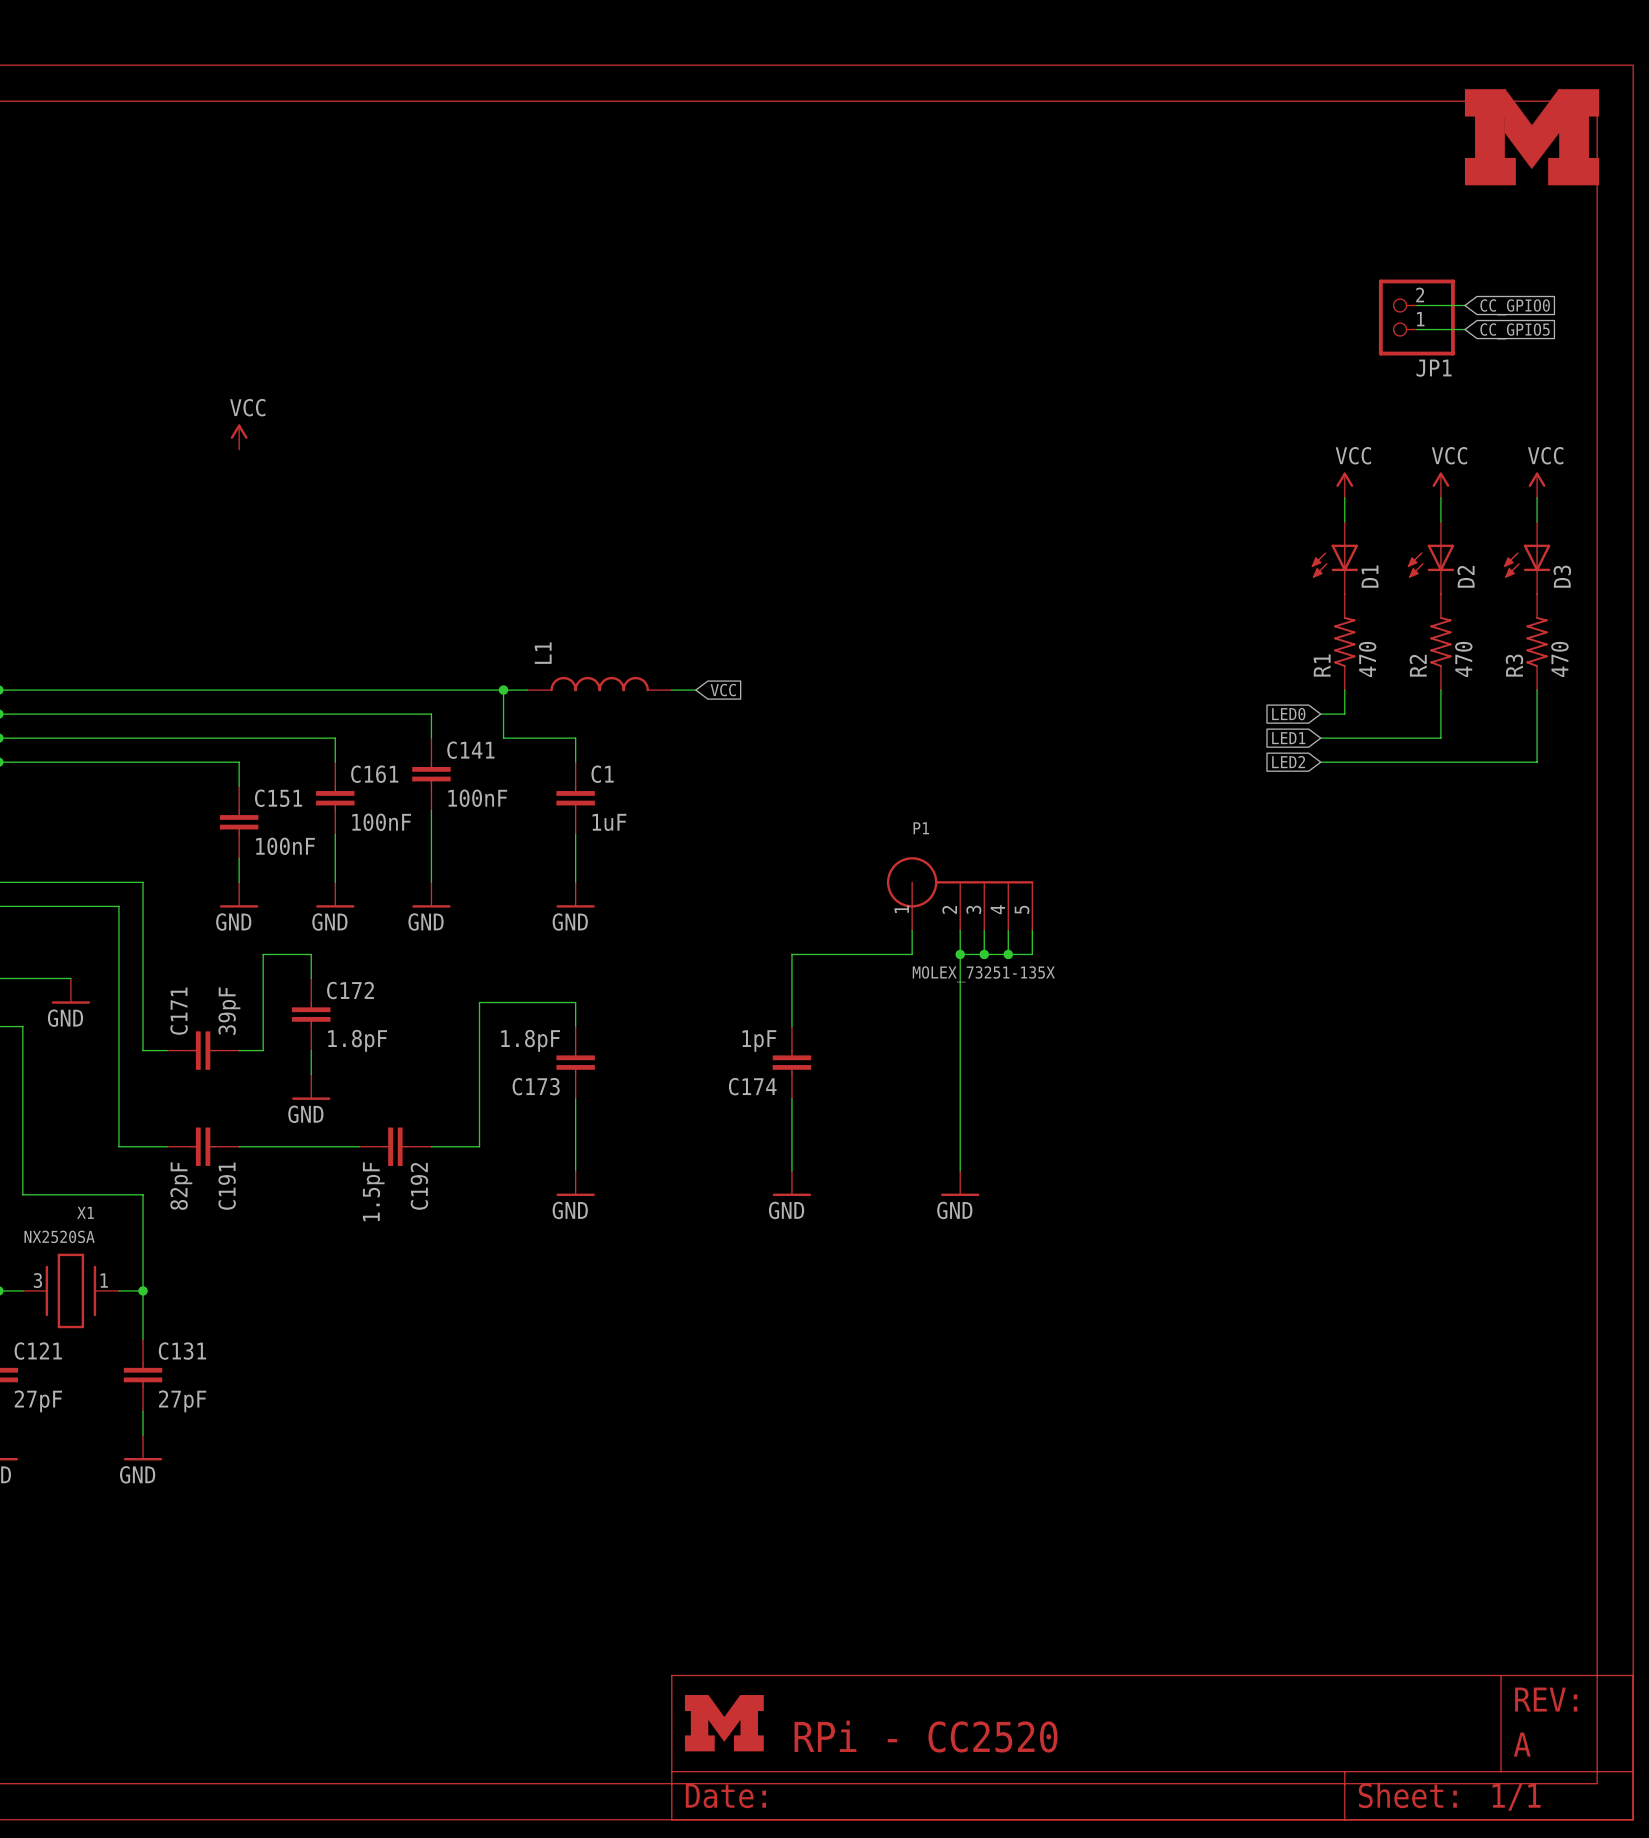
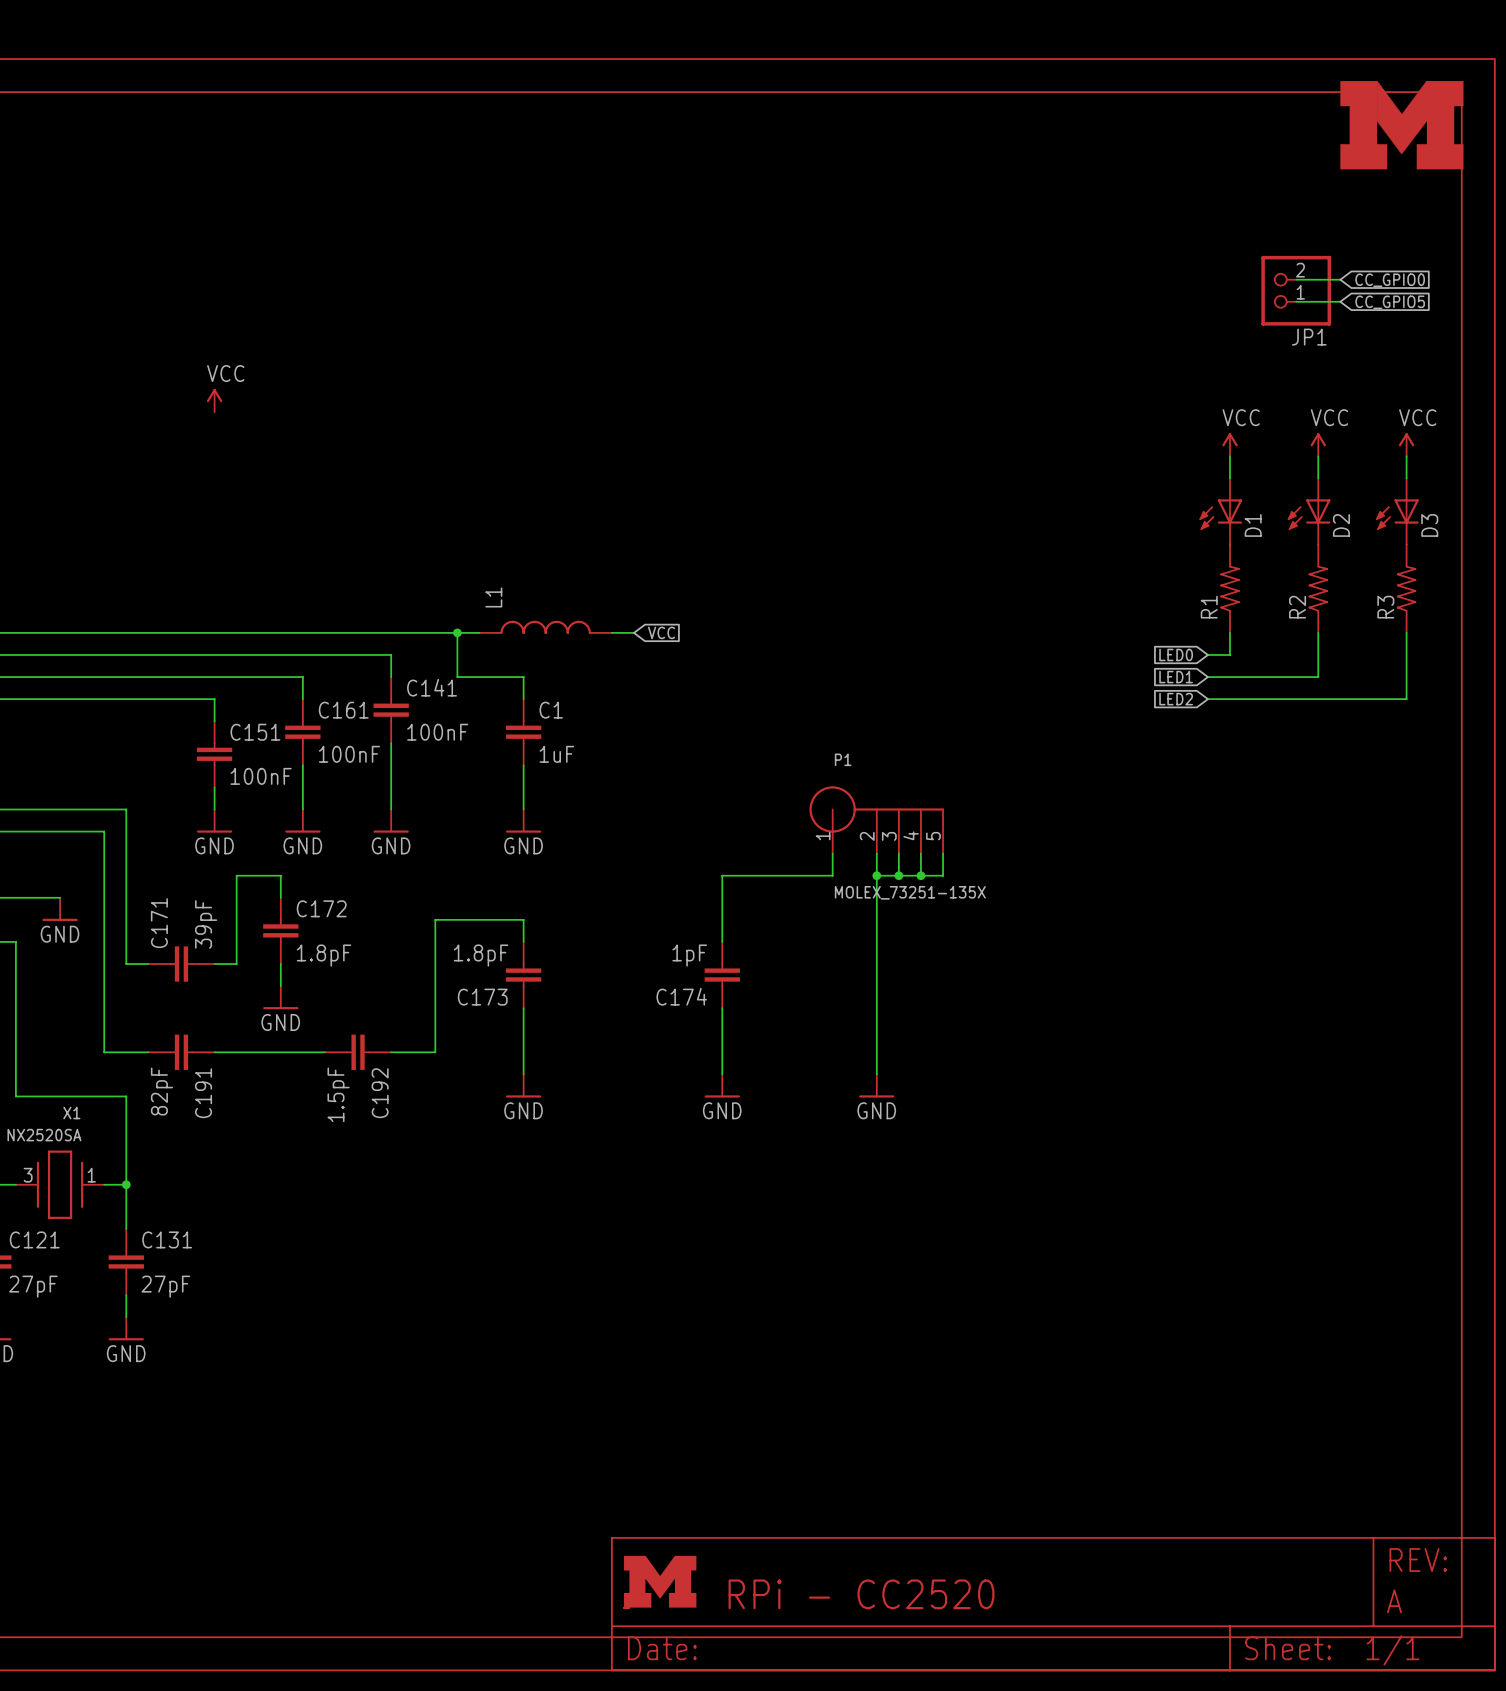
R1 value: 470 (1367, 659) -> none
R2 value: 470 (1463, 659) -> none
R3 value: 470 (1559, 659) -> none

